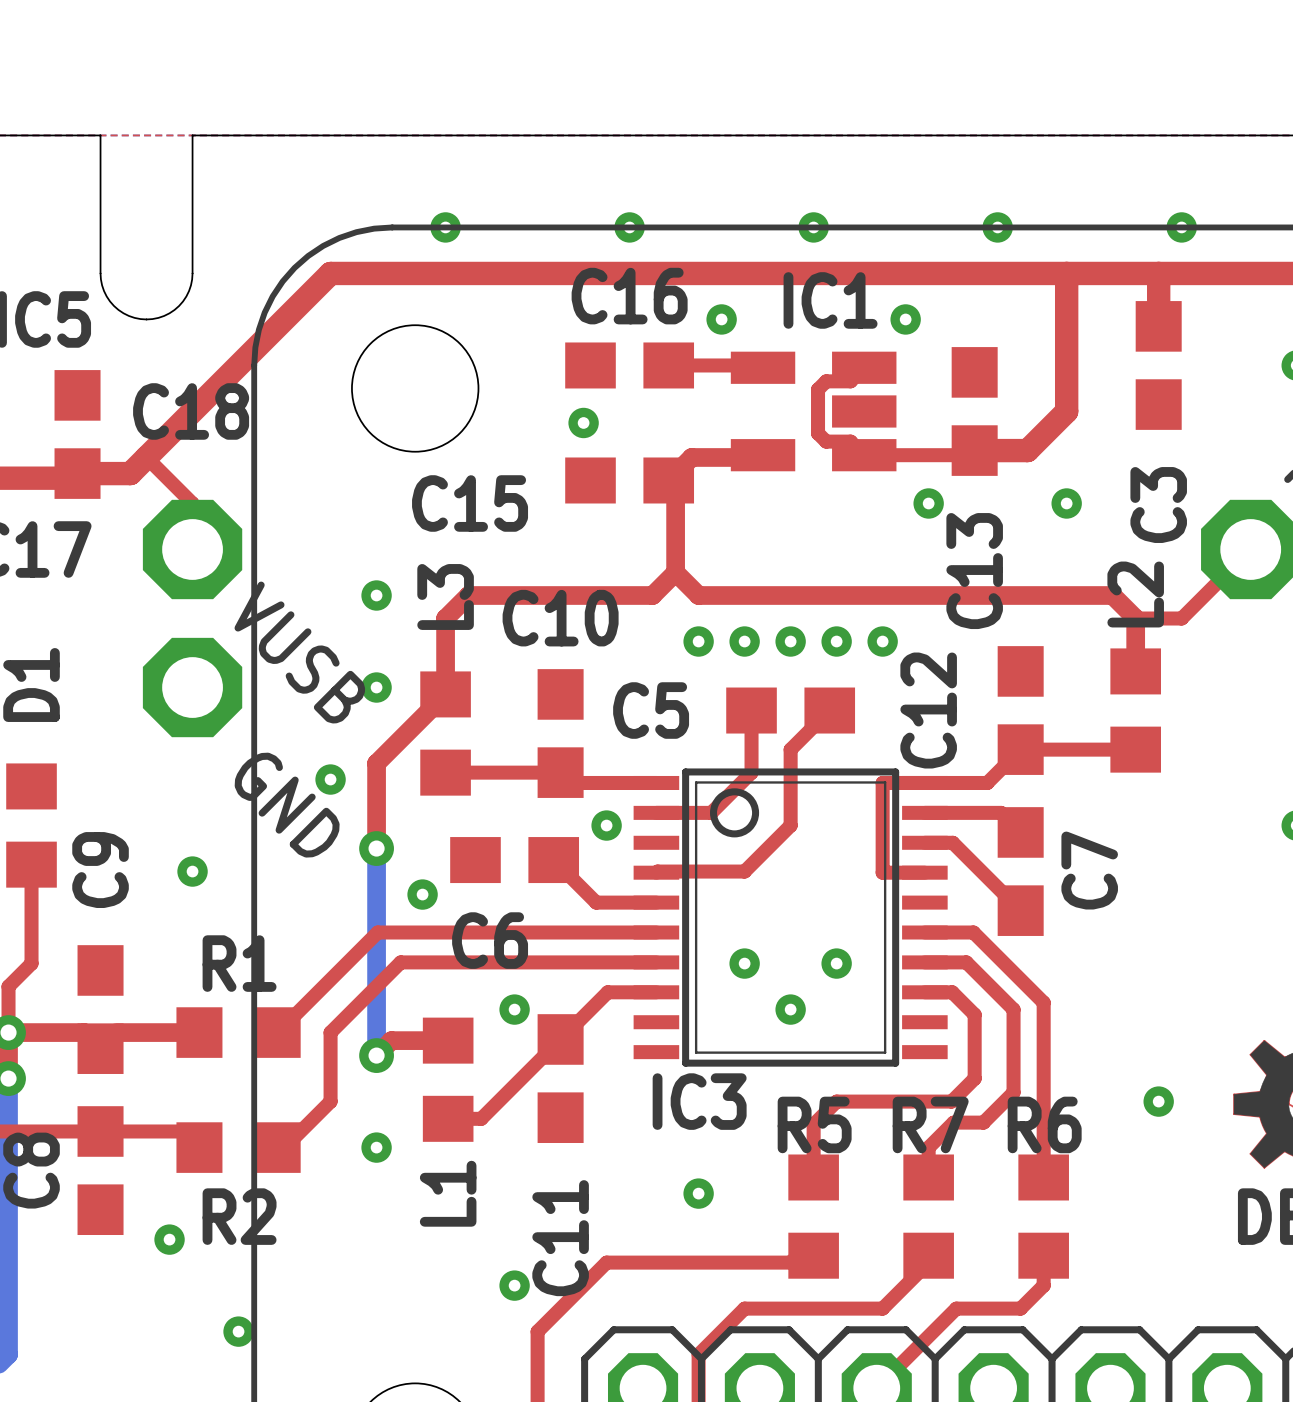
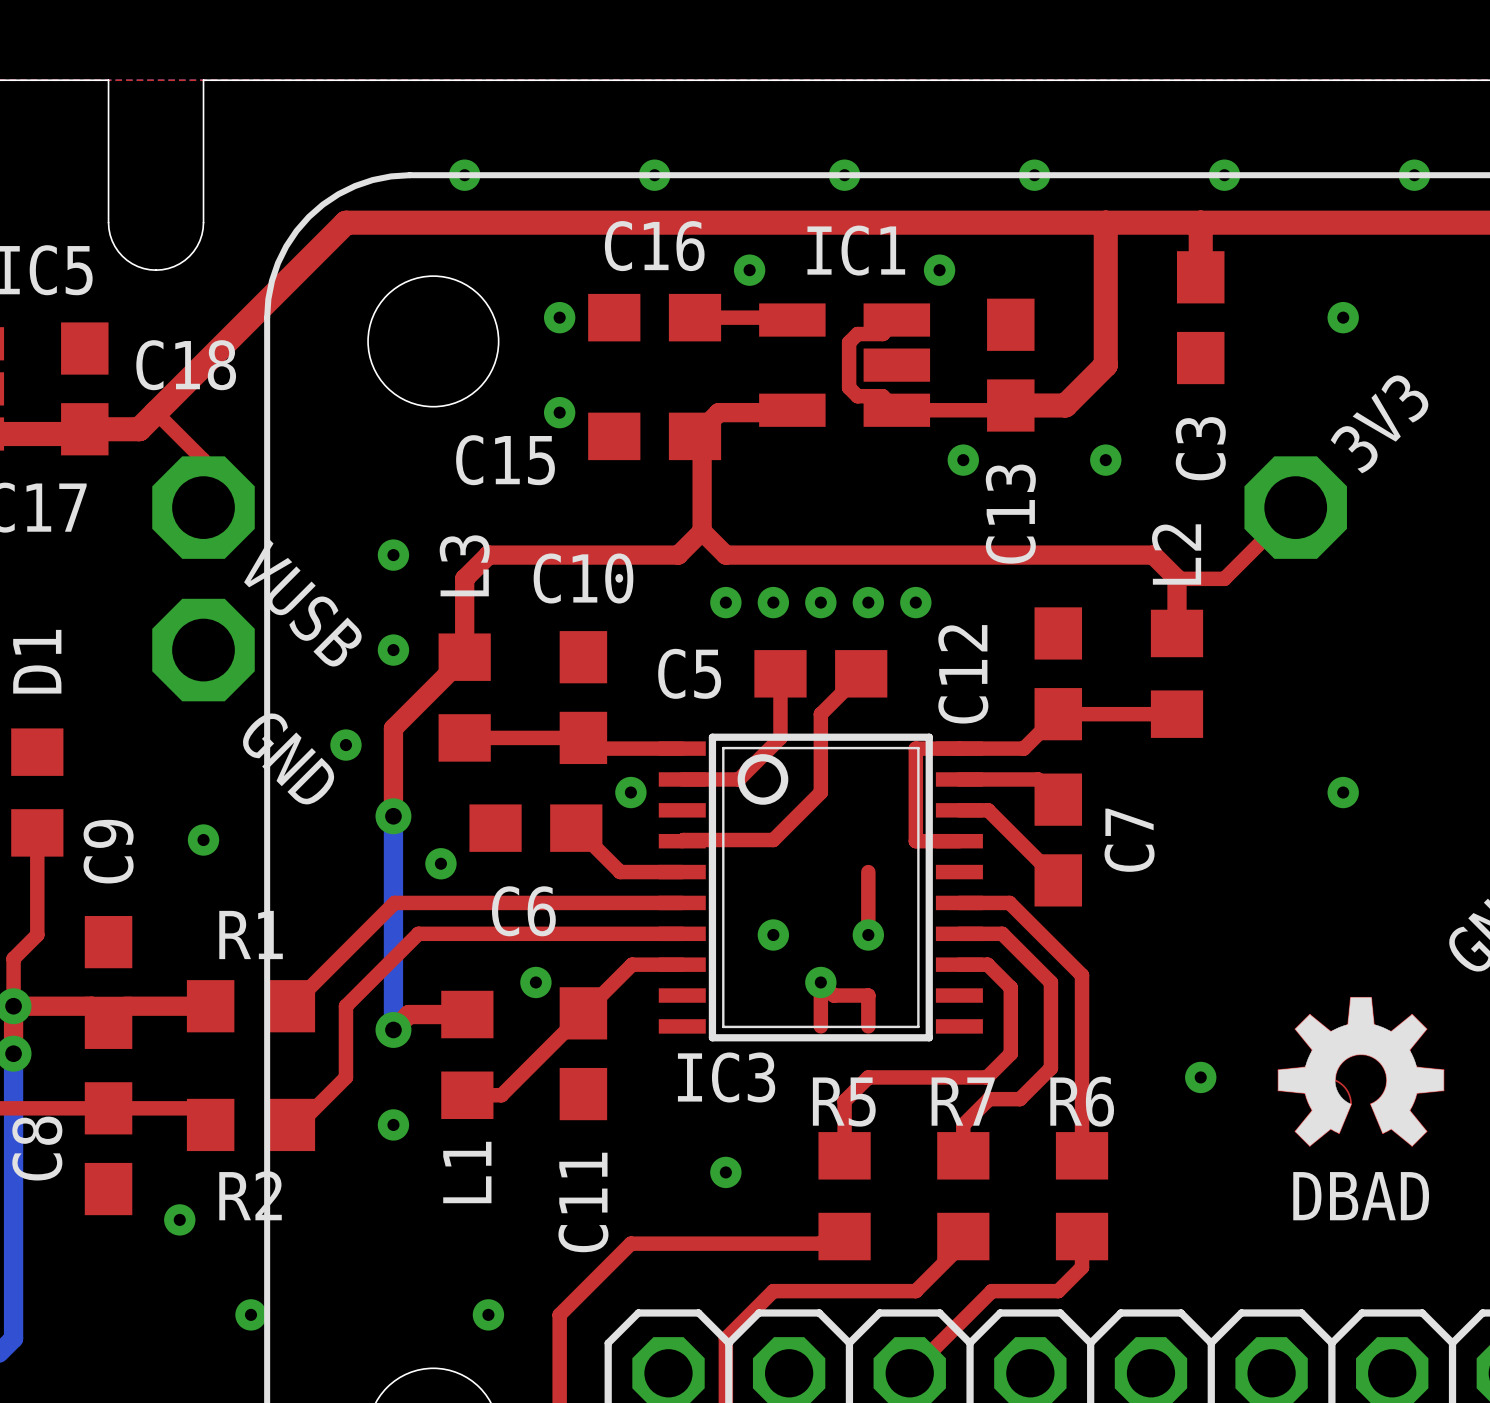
via: none -> (559, 317)
via: (583, 422) -> none
via: none -> (559, 412)
top track: none -> (868, 872) (868, 934)
top track: none -> (820, 1026) (820, 982) (833, 995) (868, 995) (868, 1026)
via position: (514, 1285) -> (488, 1314)

